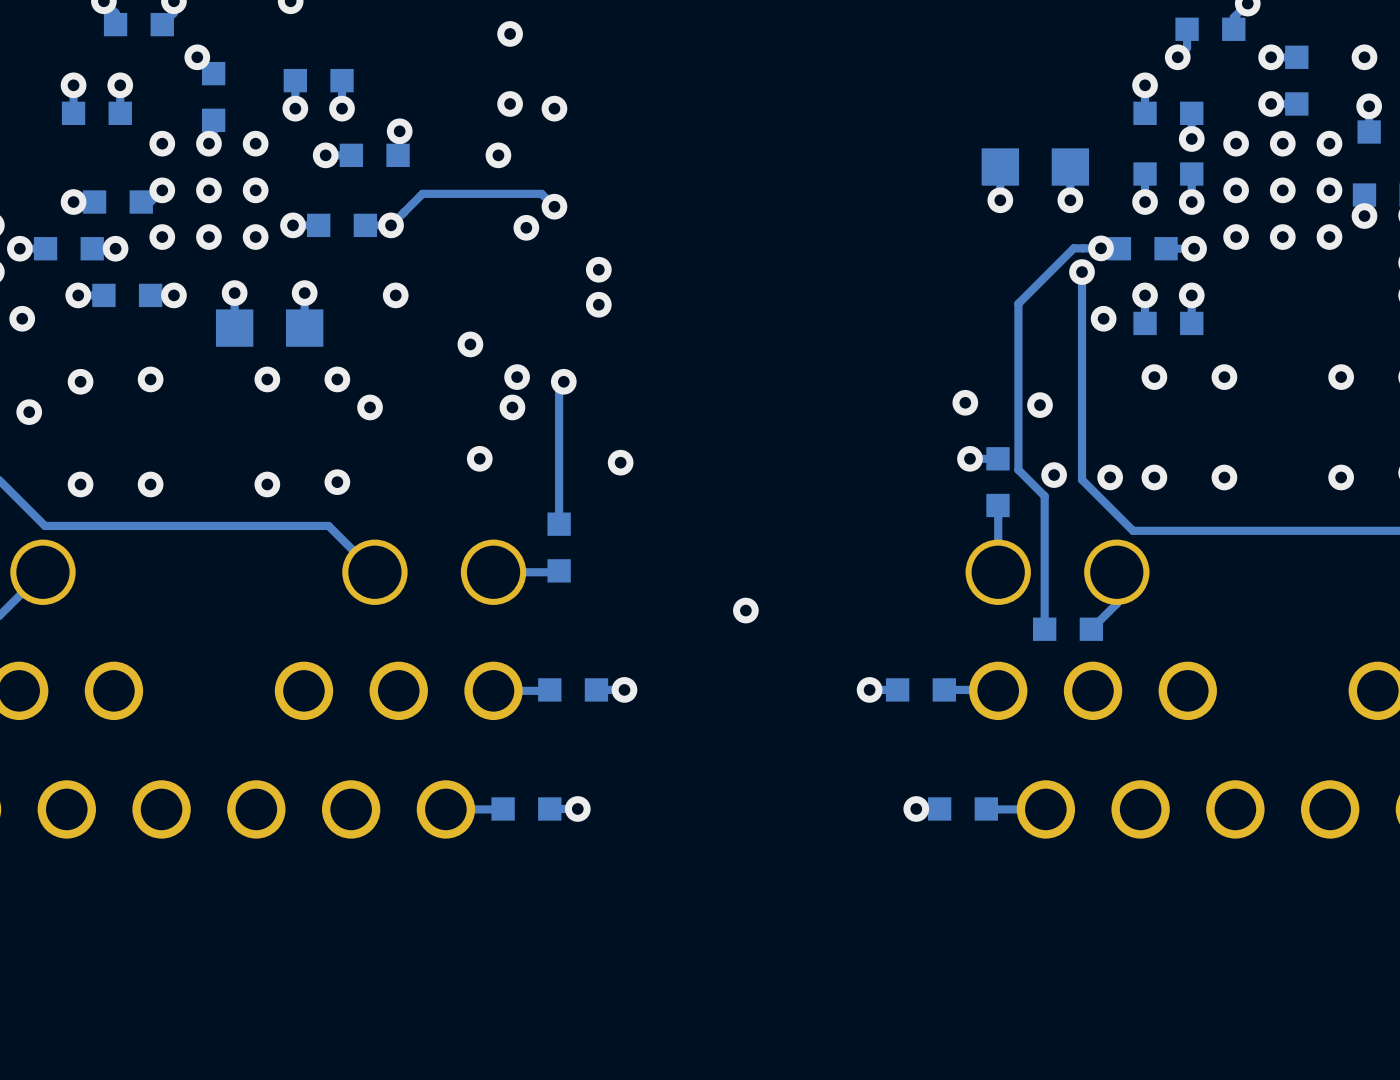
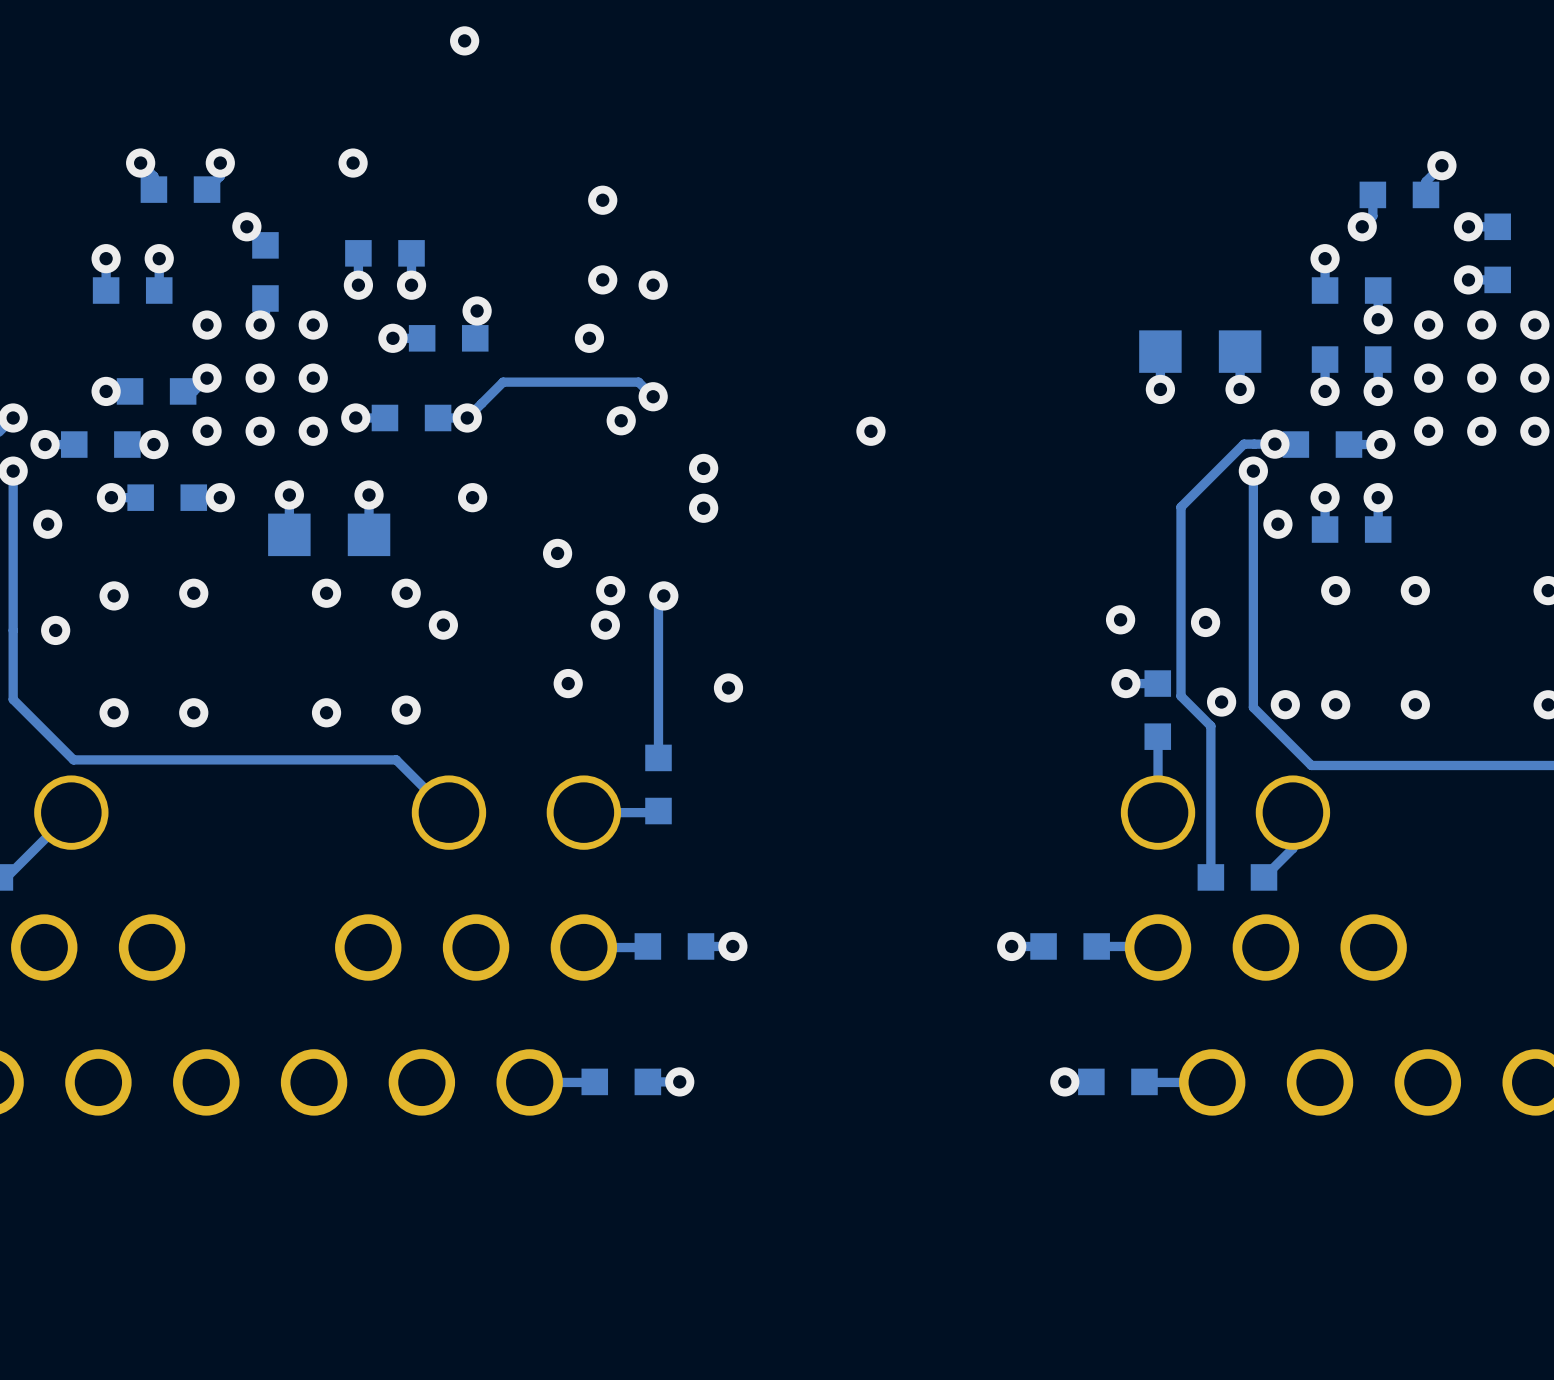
via: none -> (870, 431)
via: (745, 610) -> none

